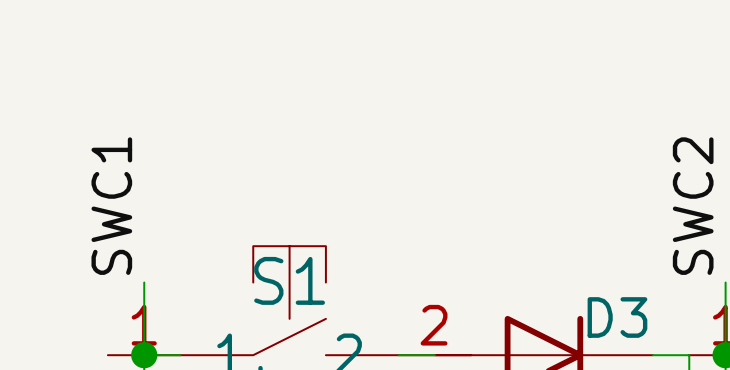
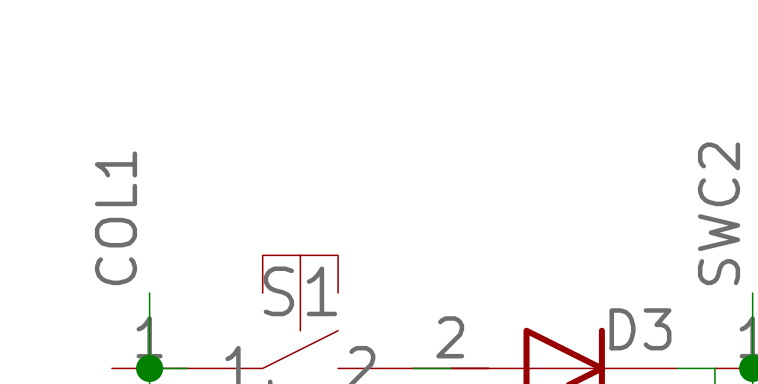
label: SWC1 (111, 206) -> COL1 (115, 218)

